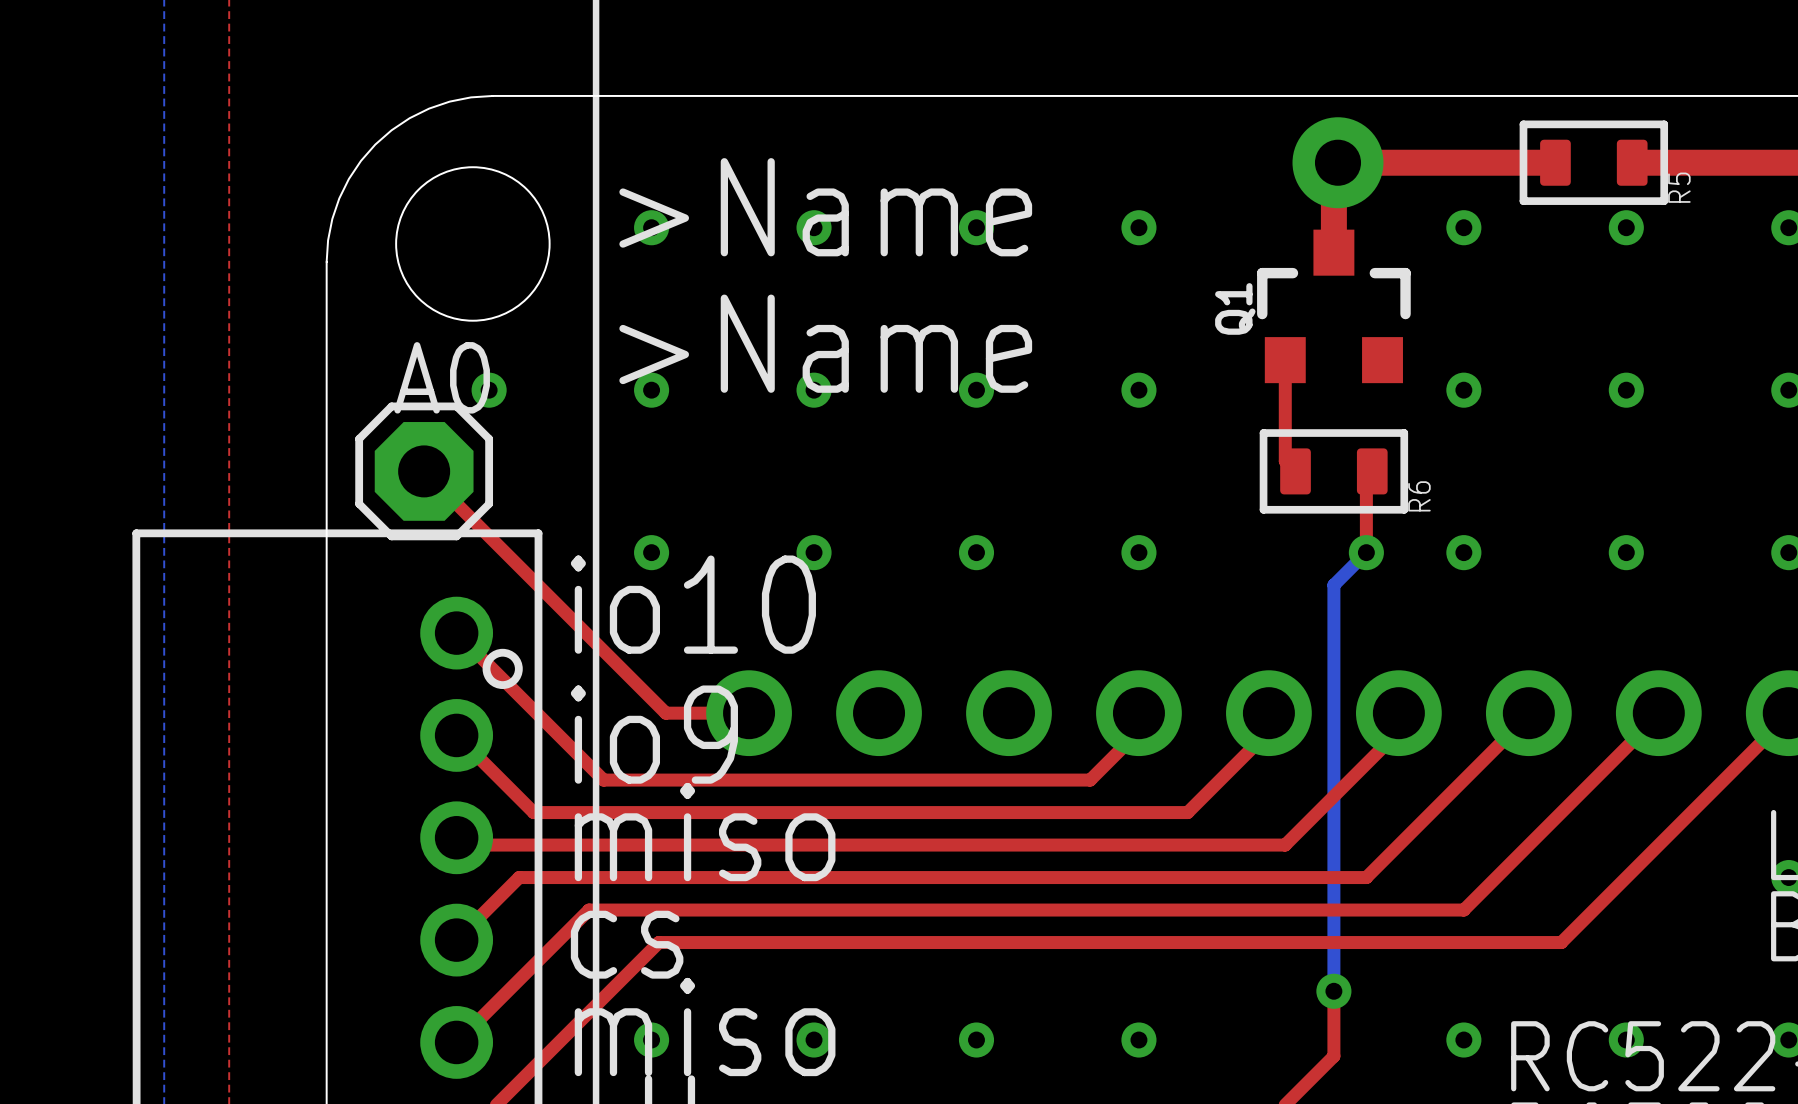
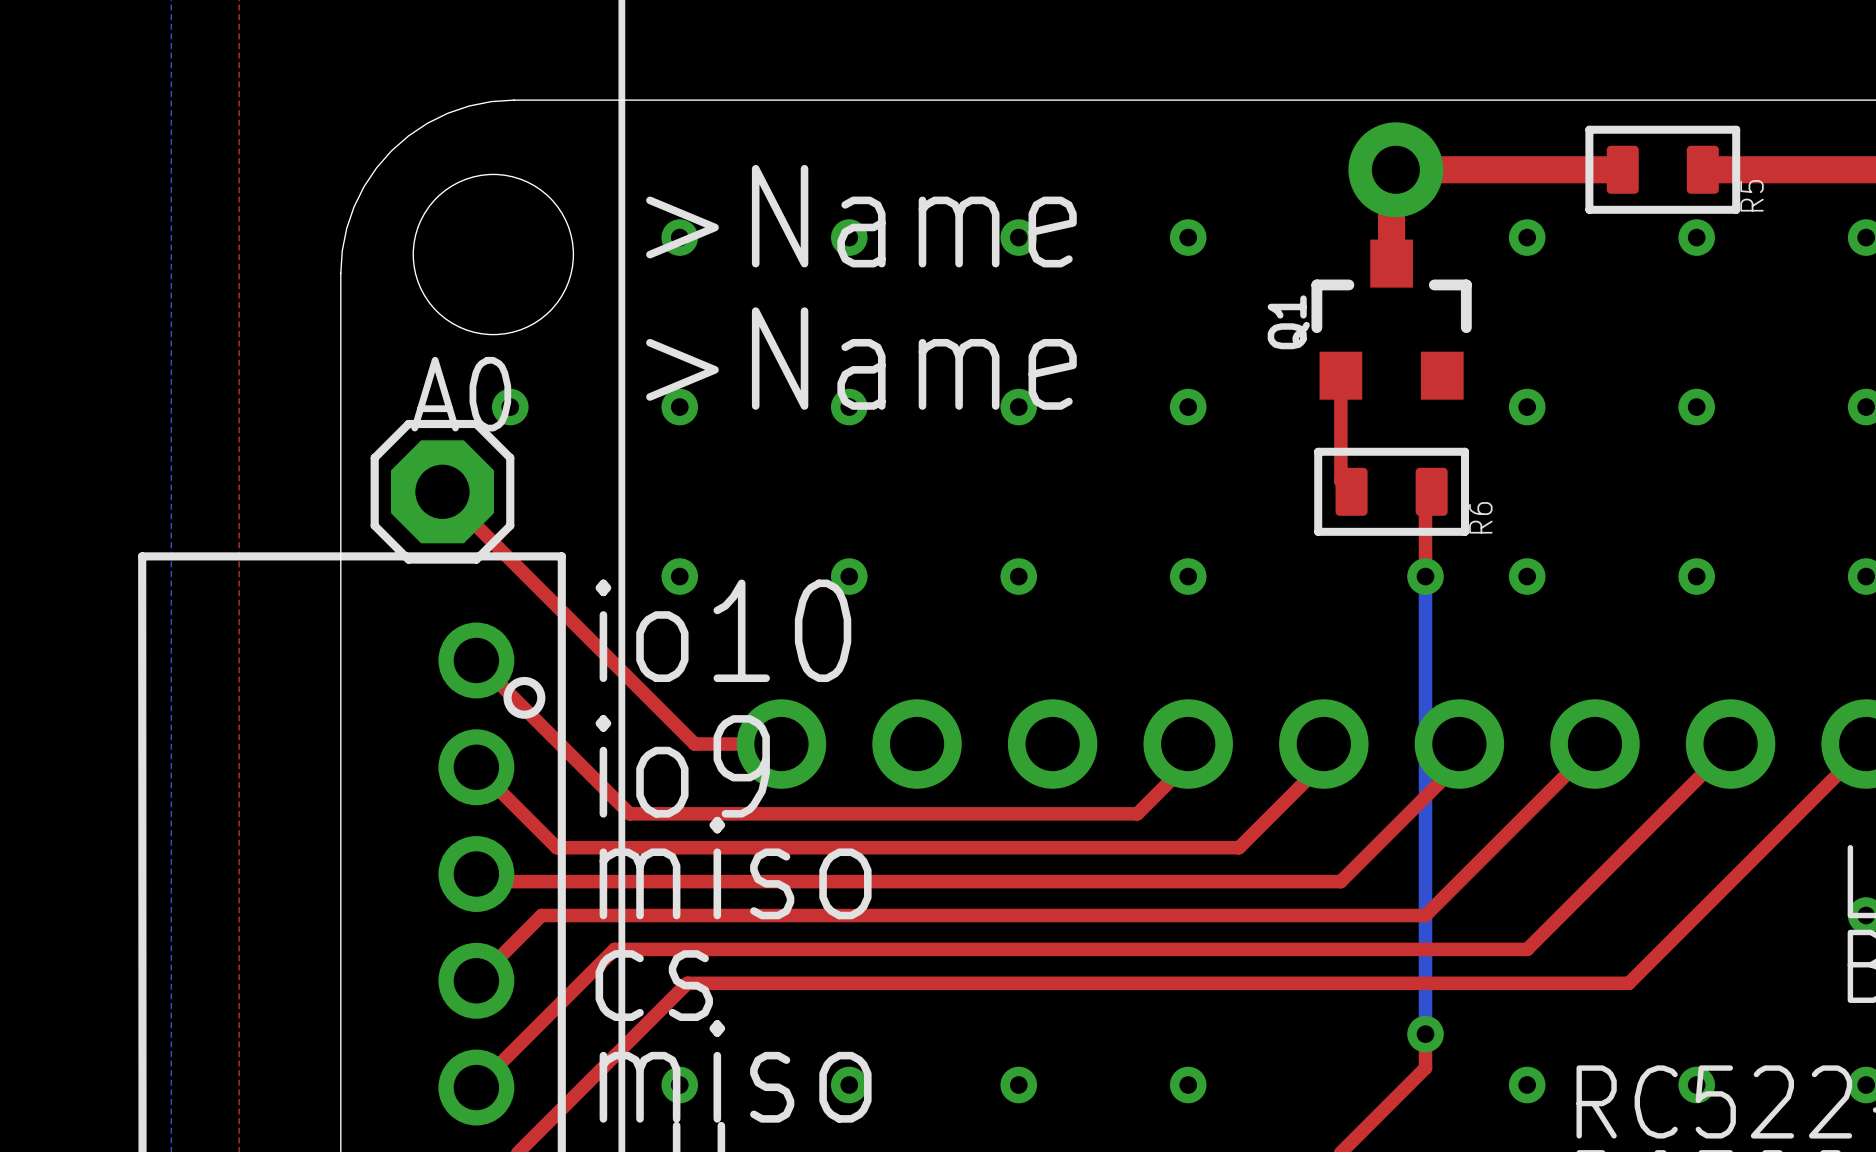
bottom track: (1366, 552) (1333, 585) (1333, 991) -> (1425, 576) (1425, 1034)
top track: (1333, 991) (1333, 1056) -> (1425, 1034) (1425, 1068) (1391, 1101)
via position: (1333, 991) -> (1425, 1034)

